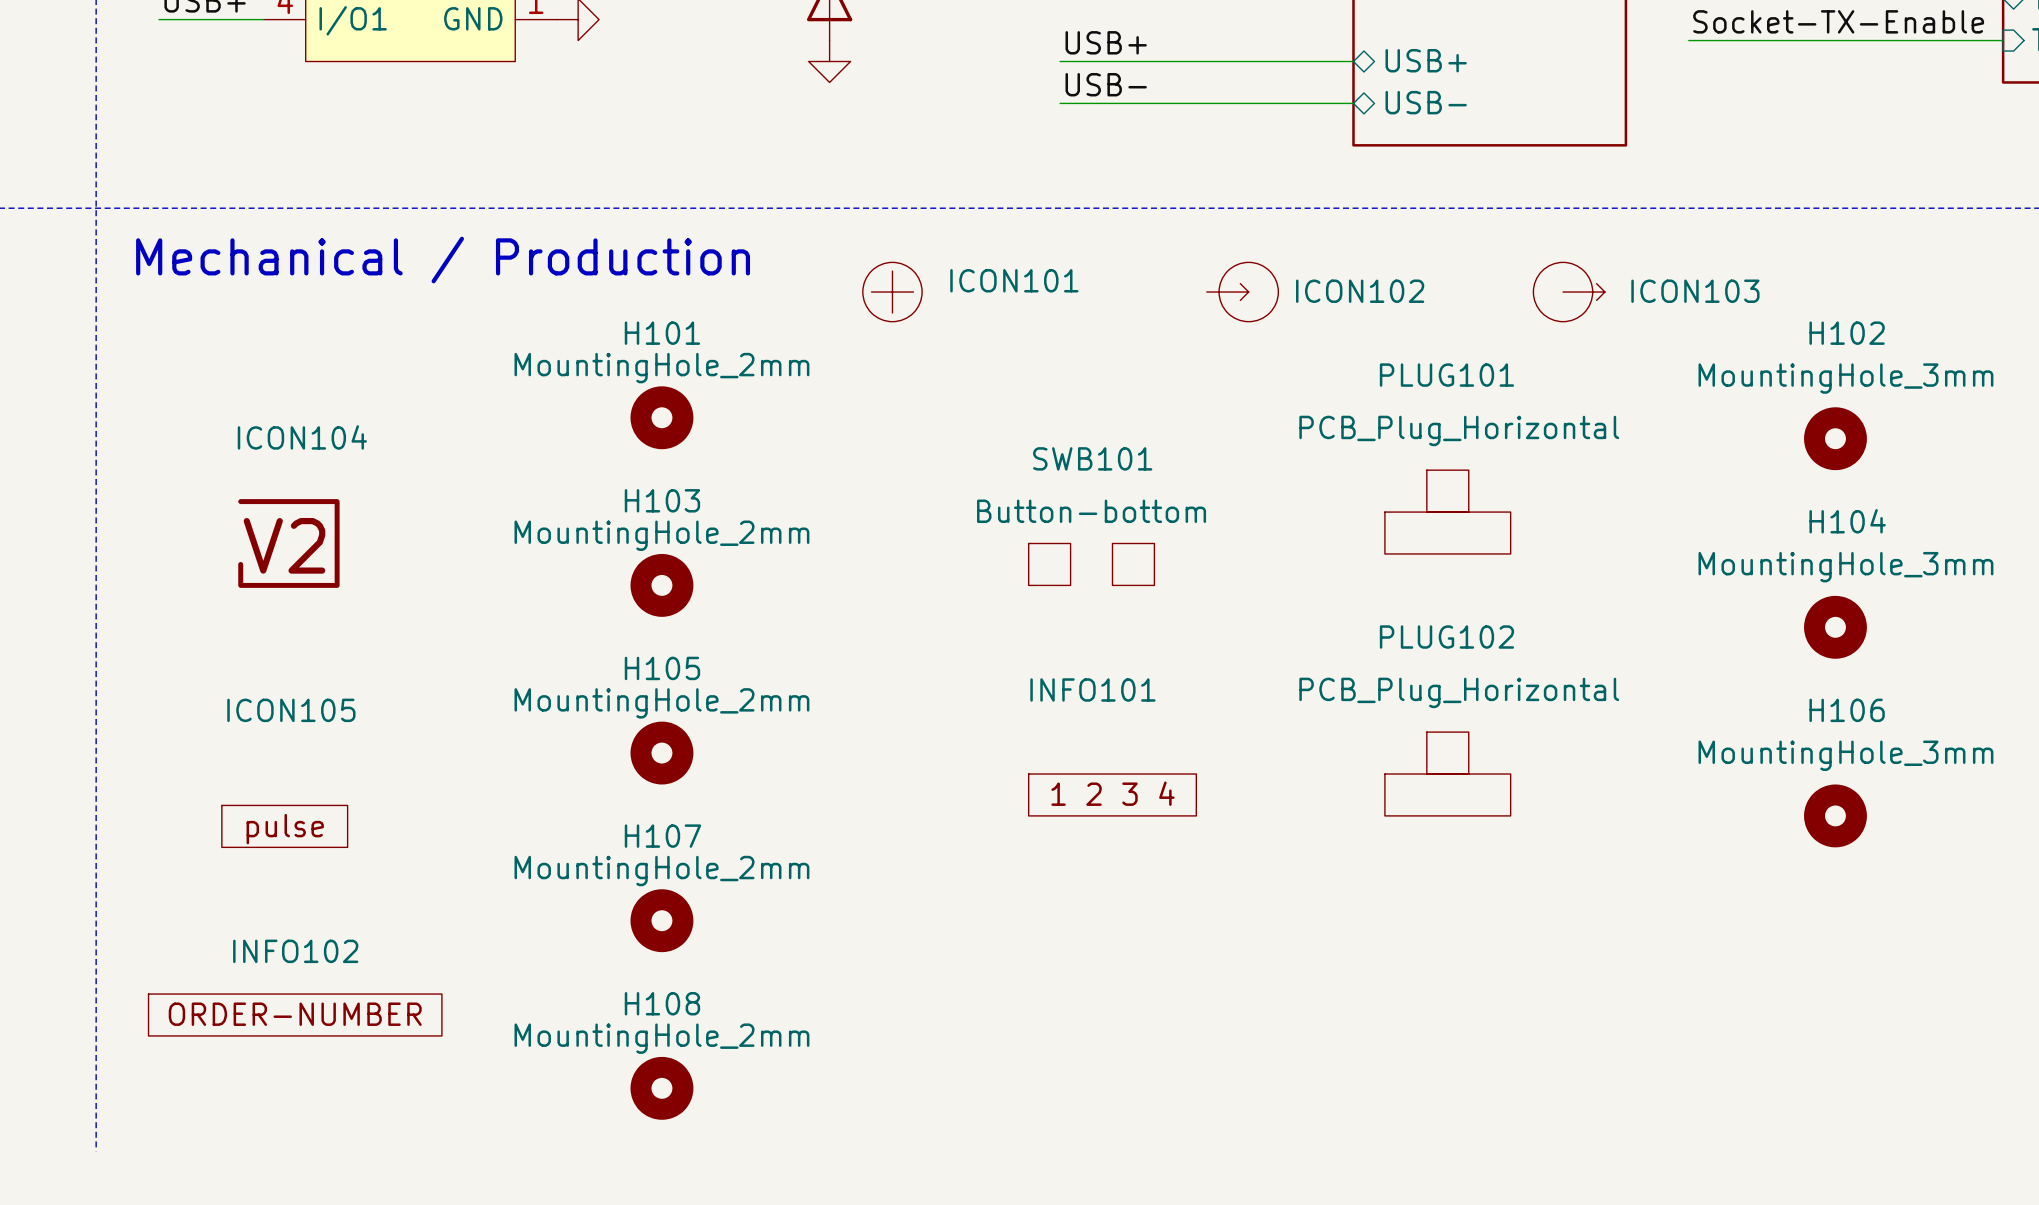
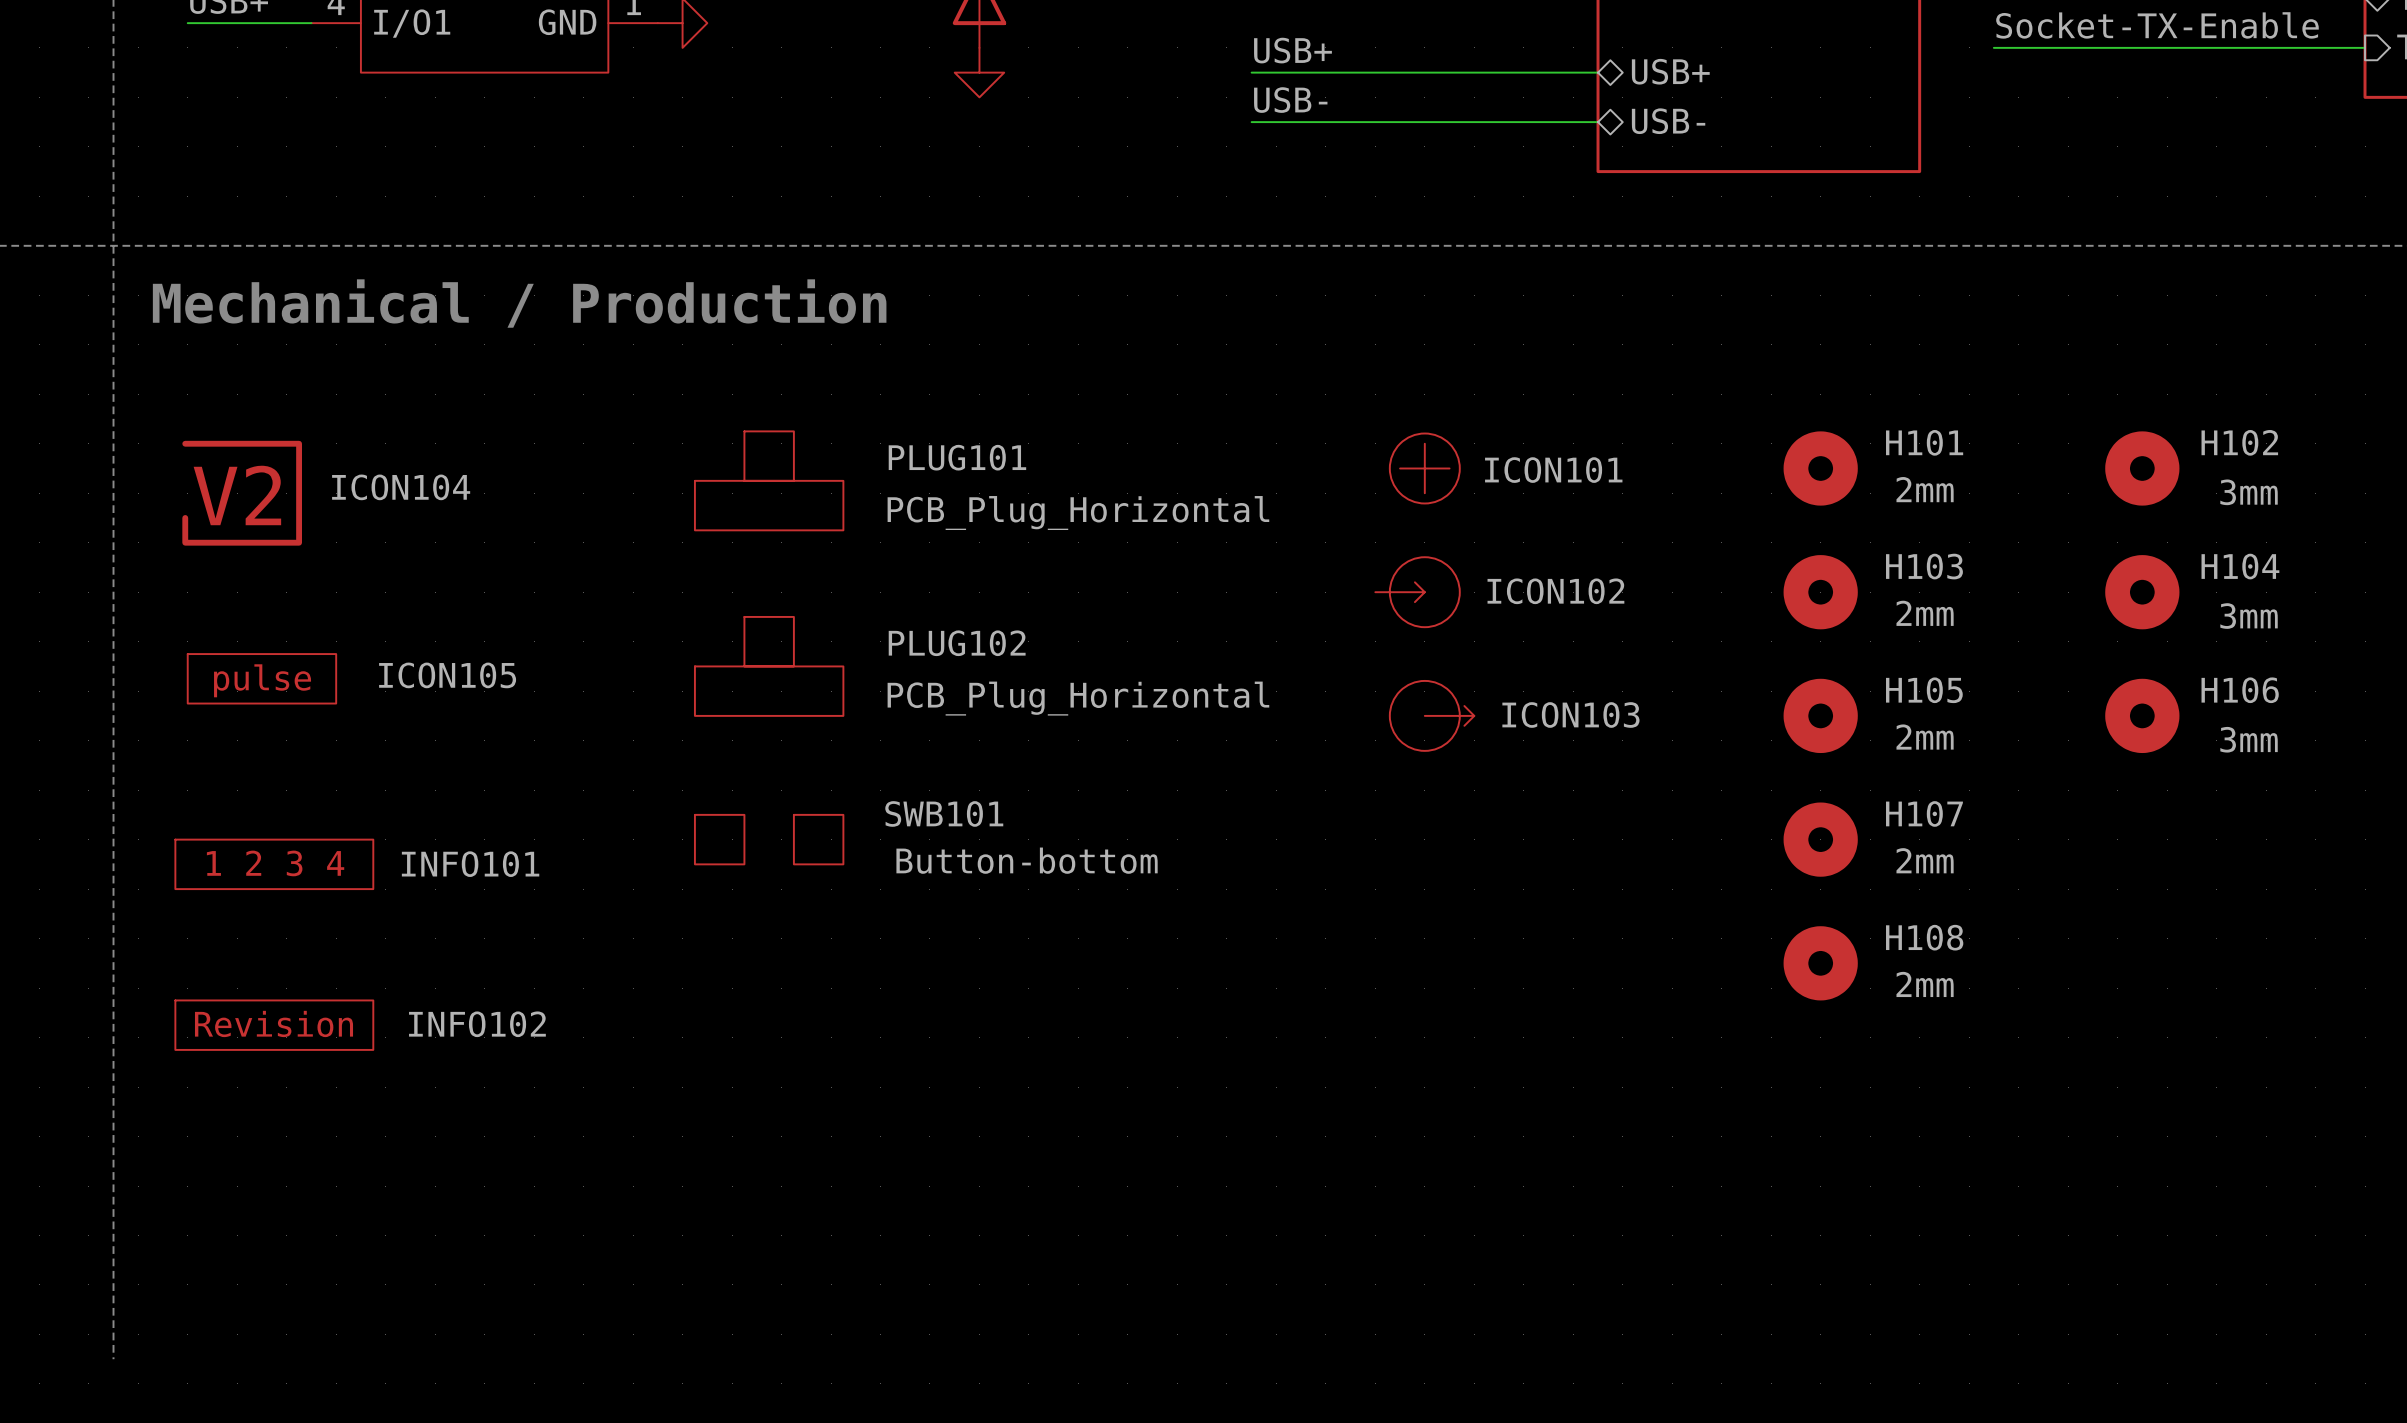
ICON101 name position: ICON101 (1014, 280) -> ICON101 (1553, 470)
ICON102 name position: ICON102 (1360, 291) -> ICON102 (1555, 591)
ICON101 position: (892, 292) -> (1424, 468)
ICON102 position: (1242, 292) -> (1417, 592)
ICON103 position: (1569, 292) -> (1432, 715)
H101 name position: H101 (662, 333) -> H101 (1924, 442)
H102 name position: H102 (1847, 333) -> H102 (2239, 442)
H101 value: MountingHole_2mm (661, 368) -> 2mm (1925, 489)
PLUG101 name position: PLUG101 (1446, 375) -> PLUG101 (957, 457)
H102 value: MountingHole_3mm (1845, 378) -> 3mm (2249, 492)
H101 position: (661, 417) -> (1820, 468)
PLUG101 value position: PCB_Plug_Horizontal (1459, 430) -> PCB_Plug_Horizontal (1078, 513)
ICON104 name position: ICON104 (302, 437) -> ICON104 (401, 487)
H102 position: (1835, 438) -> (2142, 468)
SWB101 name position: SWB101 (1092, 458) -> SWB101 (944, 813)
H103 name position: H103 (662, 500) -> H103 (1924, 566)
SWB101 value position: Button-bottom (1091, 511) -> Button-bottom (1027, 860)
PLUG101 position: (1447, 512) -> (769, 480)
H104 name position: H104 (1847, 521) -> H104 (2240, 566)
H103 value: MountingHole_2mm (661, 535) -> 2mm (1925, 613)
ICON104 position: (288, 543) -> (242, 493)
SWB101 position: (1091, 564) -> (769, 839)
H104 value: MountingHole_3mm (1845, 567) -> 3mm (2249, 616)
H103 position: (661, 585) -> (1820, 592)
H104 position: (1835, 627) -> (2142, 592)
PLUG102 name position: PLUG102 (1446, 637) -> PLUG102 (957, 643)
H105 name position: H105 (662, 668) -> H105 (1924, 690)
INFO101 name position: INFO101 (1092, 689) -> INFO101 (470, 864)
PLUG102 value position: PCB_Plug_Horizontal (1459, 692) -> PCB_Plug_Horizontal (1078, 698)
H105 value: MountingHole_2mm (661, 703) -> 2mm (1925, 737)
ICON105 name position: ICON105 (291, 710) -> ICON105 (447, 675)
H106 name position: H106 (1847, 710) -> H106 (2240, 690)
H105 position: (661, 753) -> (1820, 715)
H106 value: MountingHole_3mm (1845, 755) -> 3mm (2249, 739)
ICON105 position: (221, 774) -> (187, 616)
PLUG102 position: (1447, 774) -> (769, 666)
INFO101 position: (1112, 794) -> (274, 864)
H106 position: (1835, 815) -> (2142, 715)
H107 name position: H107 (662, 836) -> H107 (1924, 813)
H107 value: MountingHole_2mm (661, 871) -> 2mm (1925, 860)
H107 position: (661, 920) -> (1820, 839)
INFO102 name position: INFO102 (295, 951) -> INFO102 (477, 1024)
INFO102 symbol: [148, 994, 442, 1036] -> [175, 1000, 374, 1050]
H108 name position: H108 (662, 1003) -> H108 (1924, 937)
H108 value: MountingHole_2mm (661, 1038) -> 2mm (1925, 984)
H108 position: (661, 1088) -> (1820, 963)

